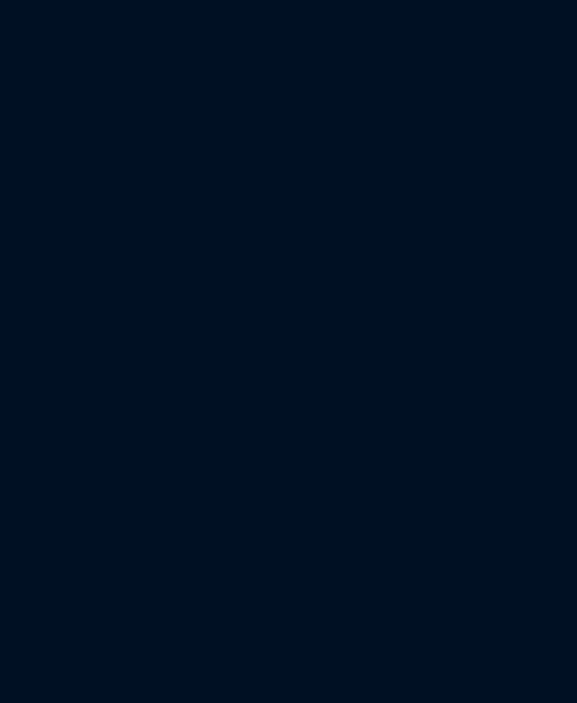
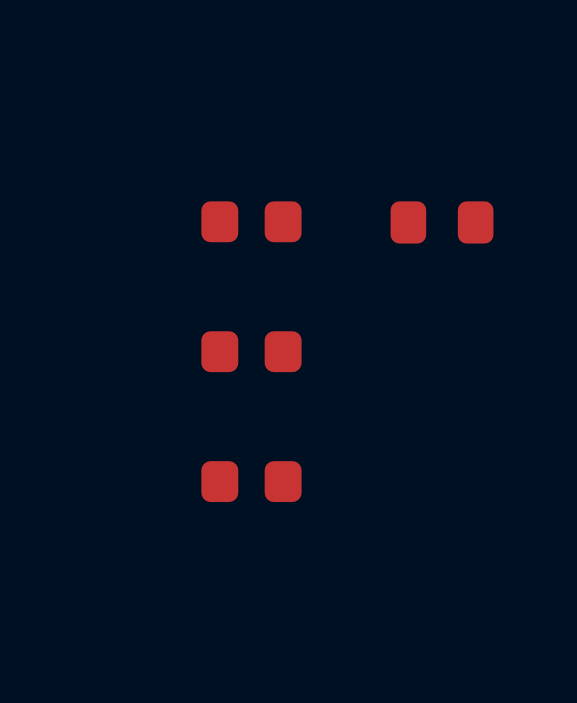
part: none -> (251, 221)
part: none -> (442, 222)
part: none -> (251, 351)
part: none -> (251, 481)

